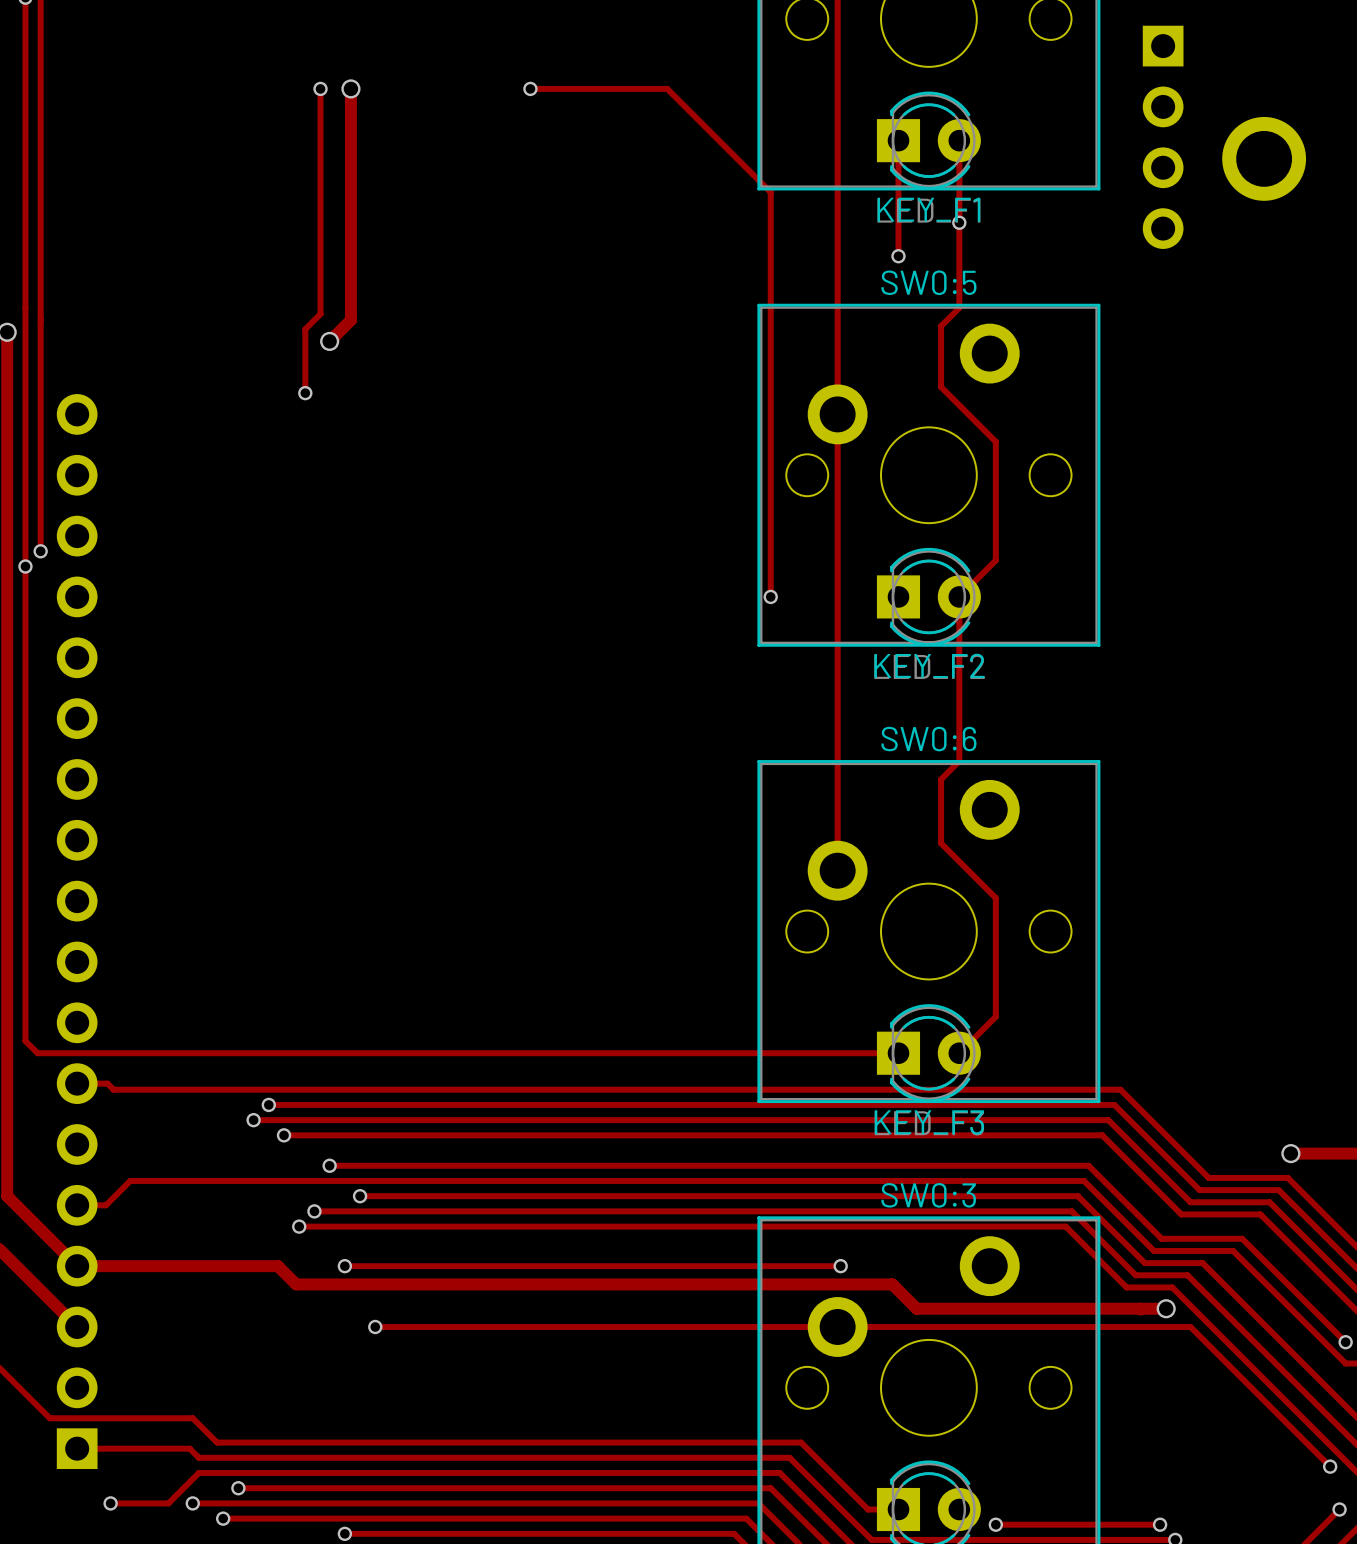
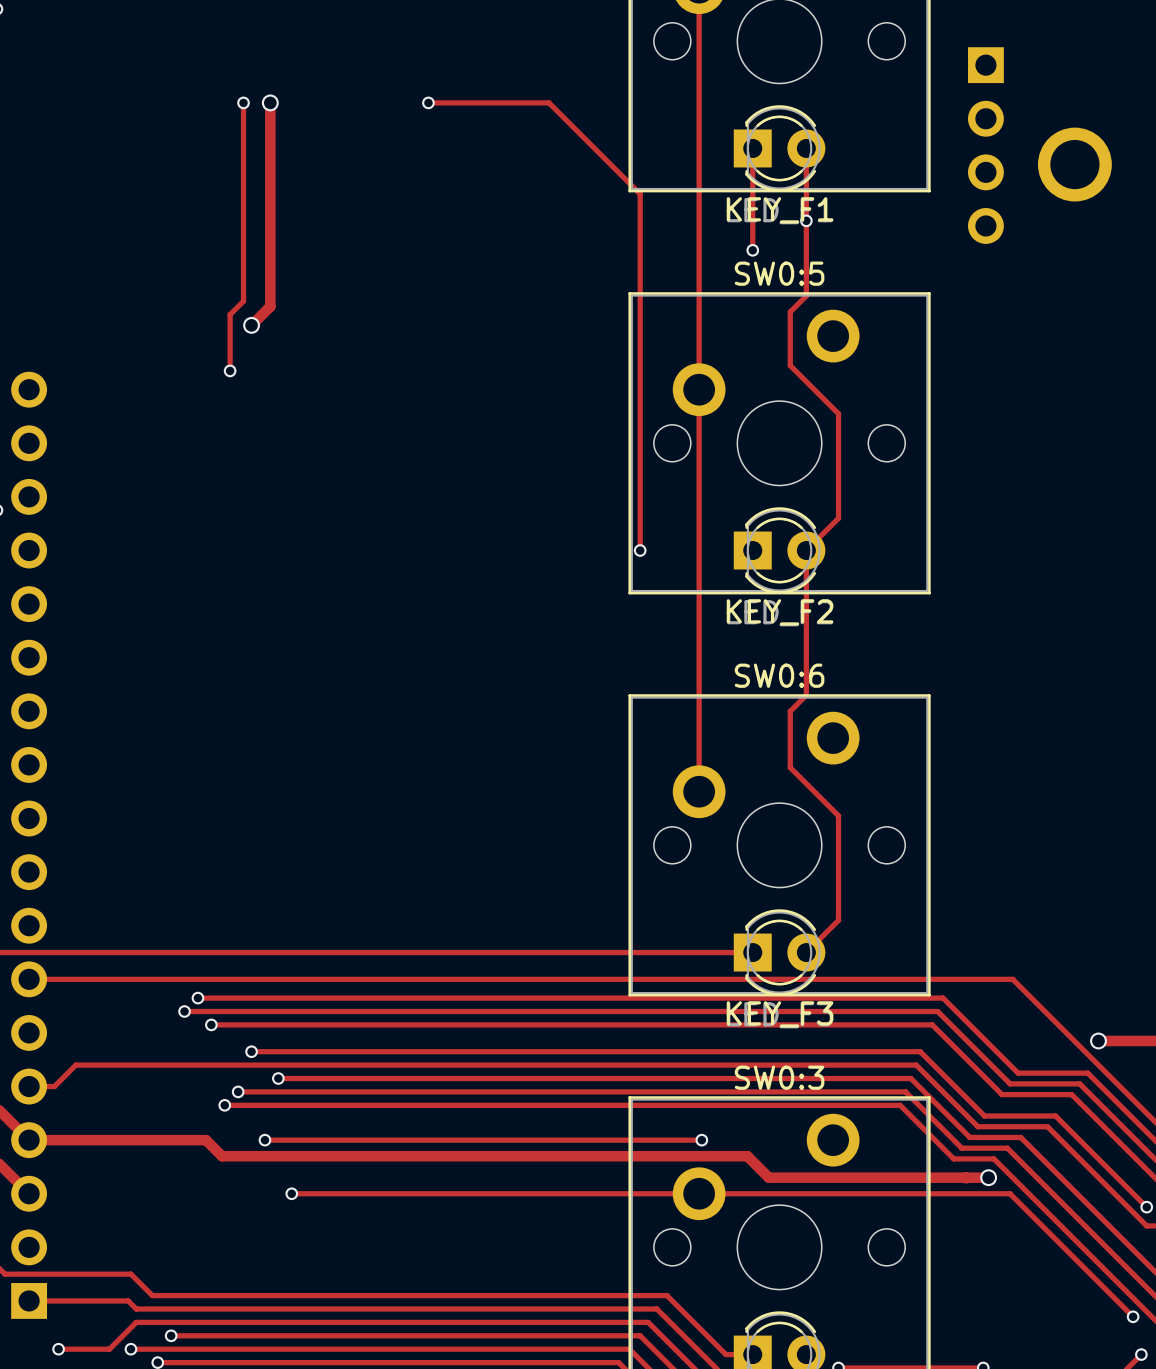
track: (107, 1083) (113, 1089) (1120, 1089) (1208, 1177) (1287, 1177) -> (55, 979) (1012, 979) (1095, 1062)

